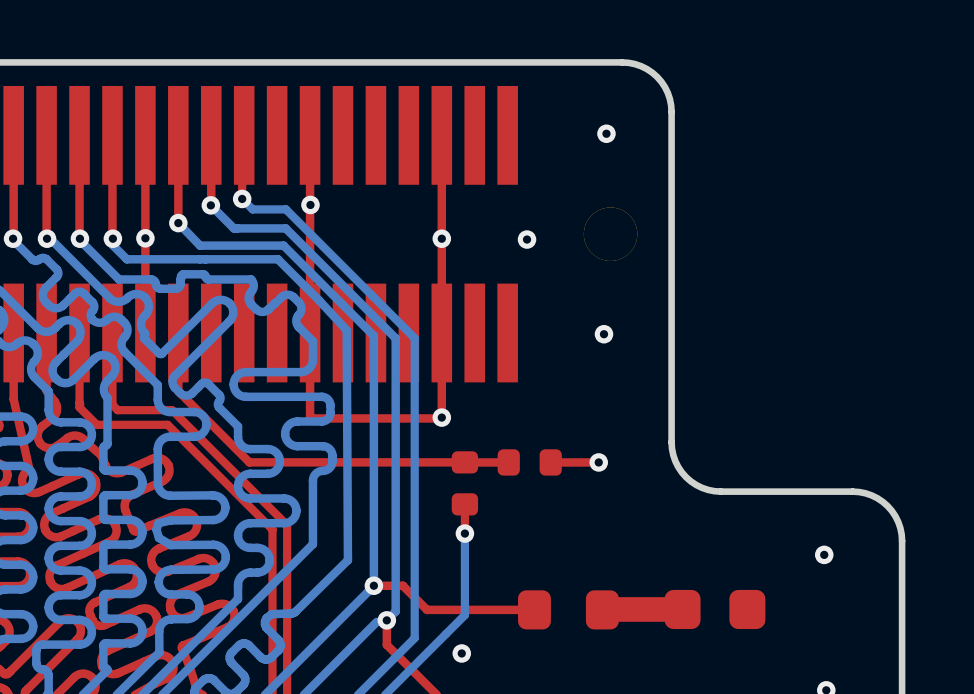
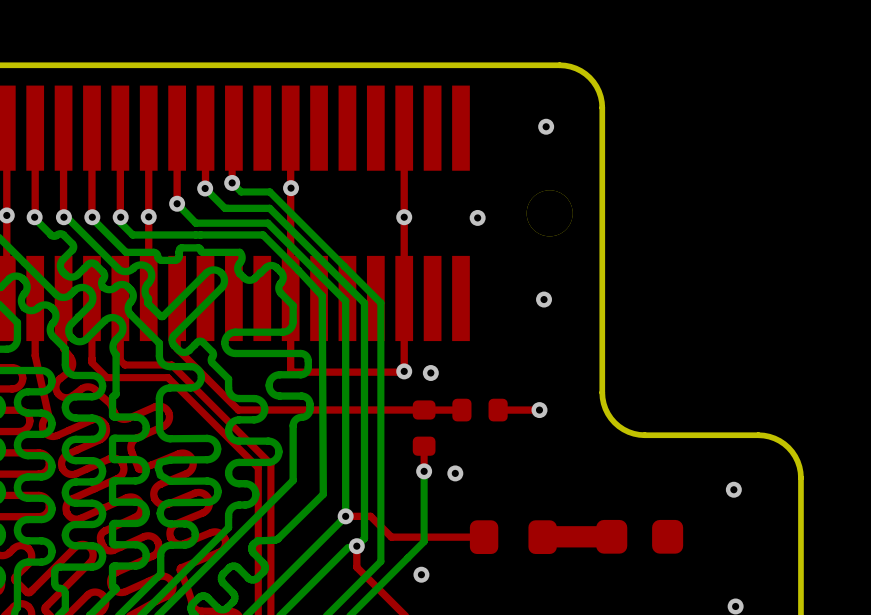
via: none -> (430, 373)
via: none -> (455, 473)

